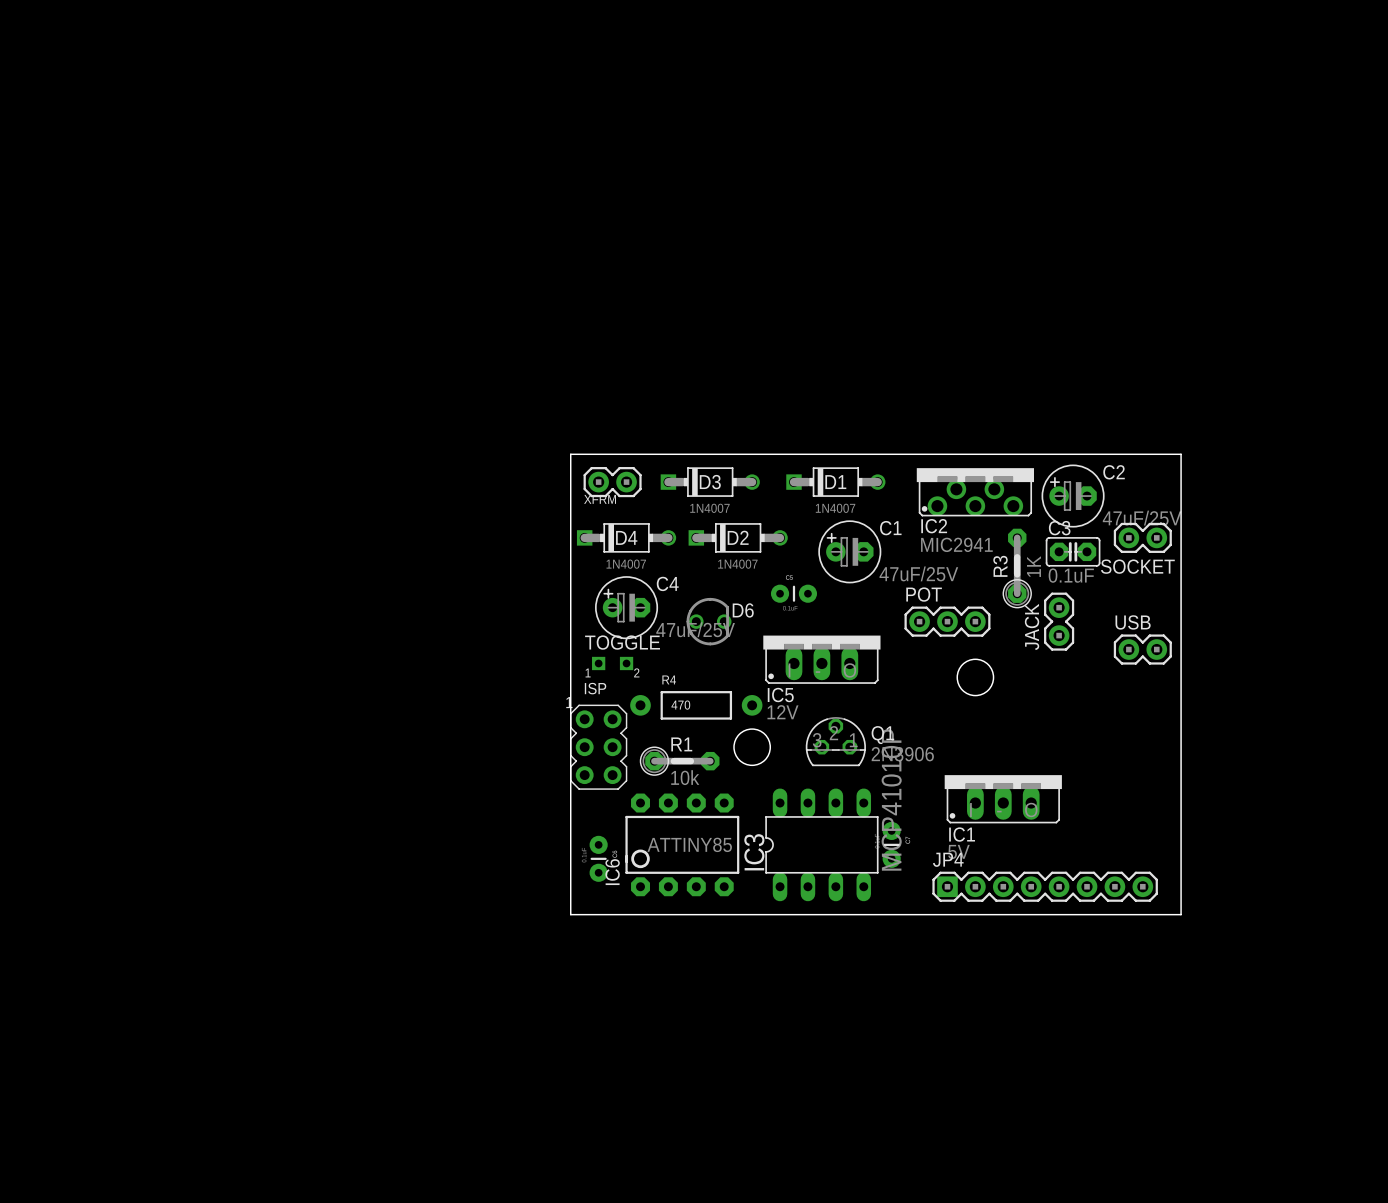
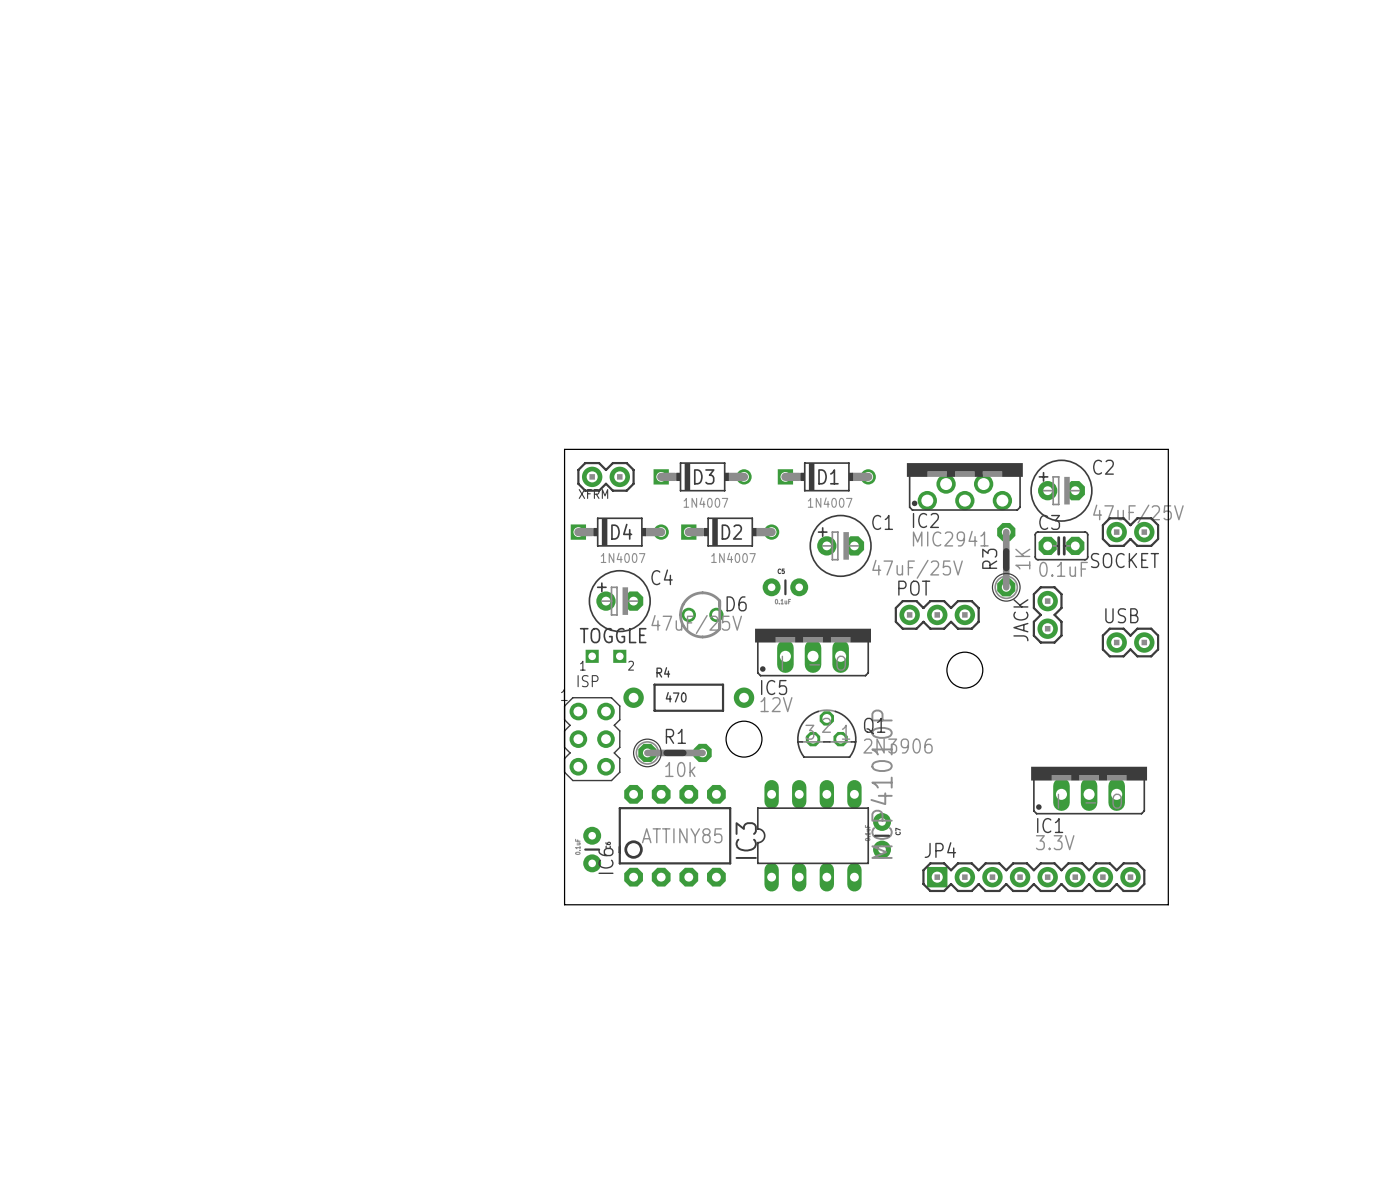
IC1 position: (1003, 799) -> (1089, 790)
IC1 value: 5V (958, 851) -> 3.3V (1055, 842)

